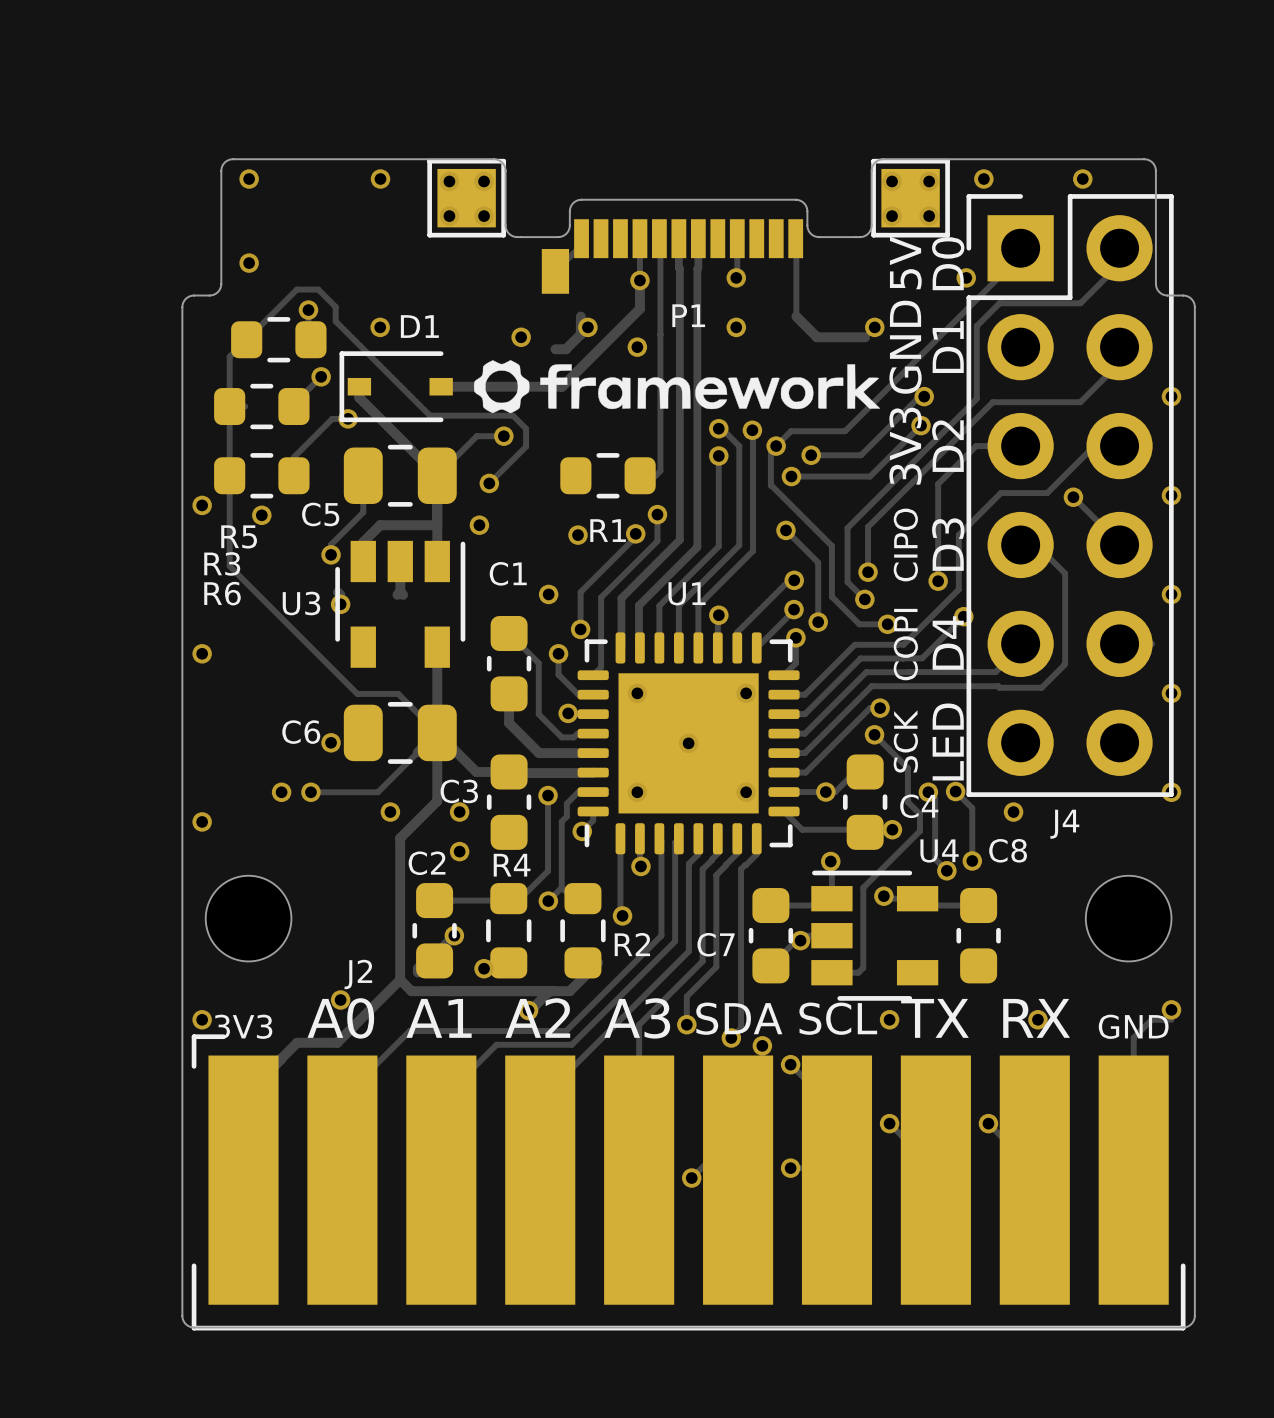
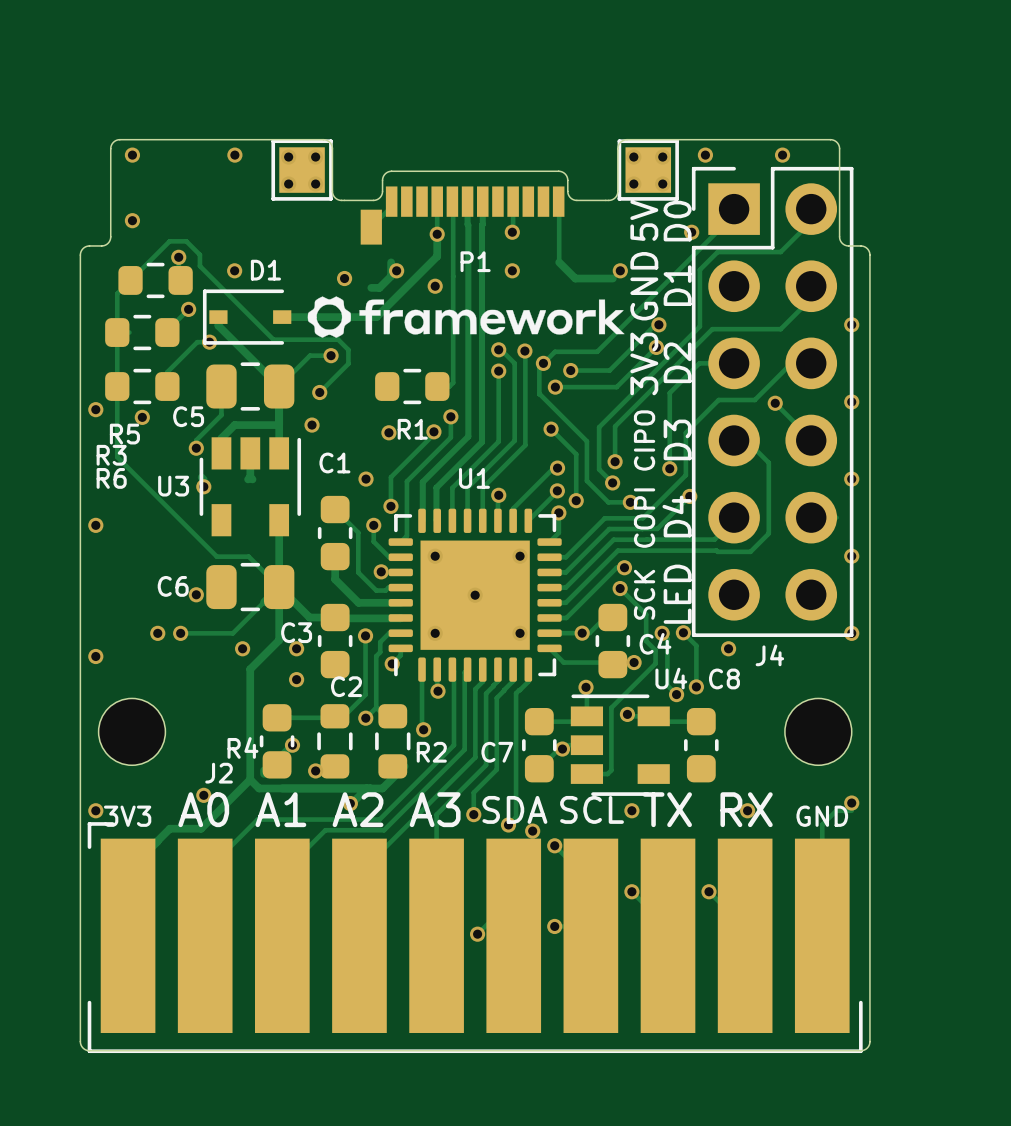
C2 name position: C2 (427, 863) -> C2 (346, 686)
R4 name position: R4 (512, 865) -> R4 (242, 747)

